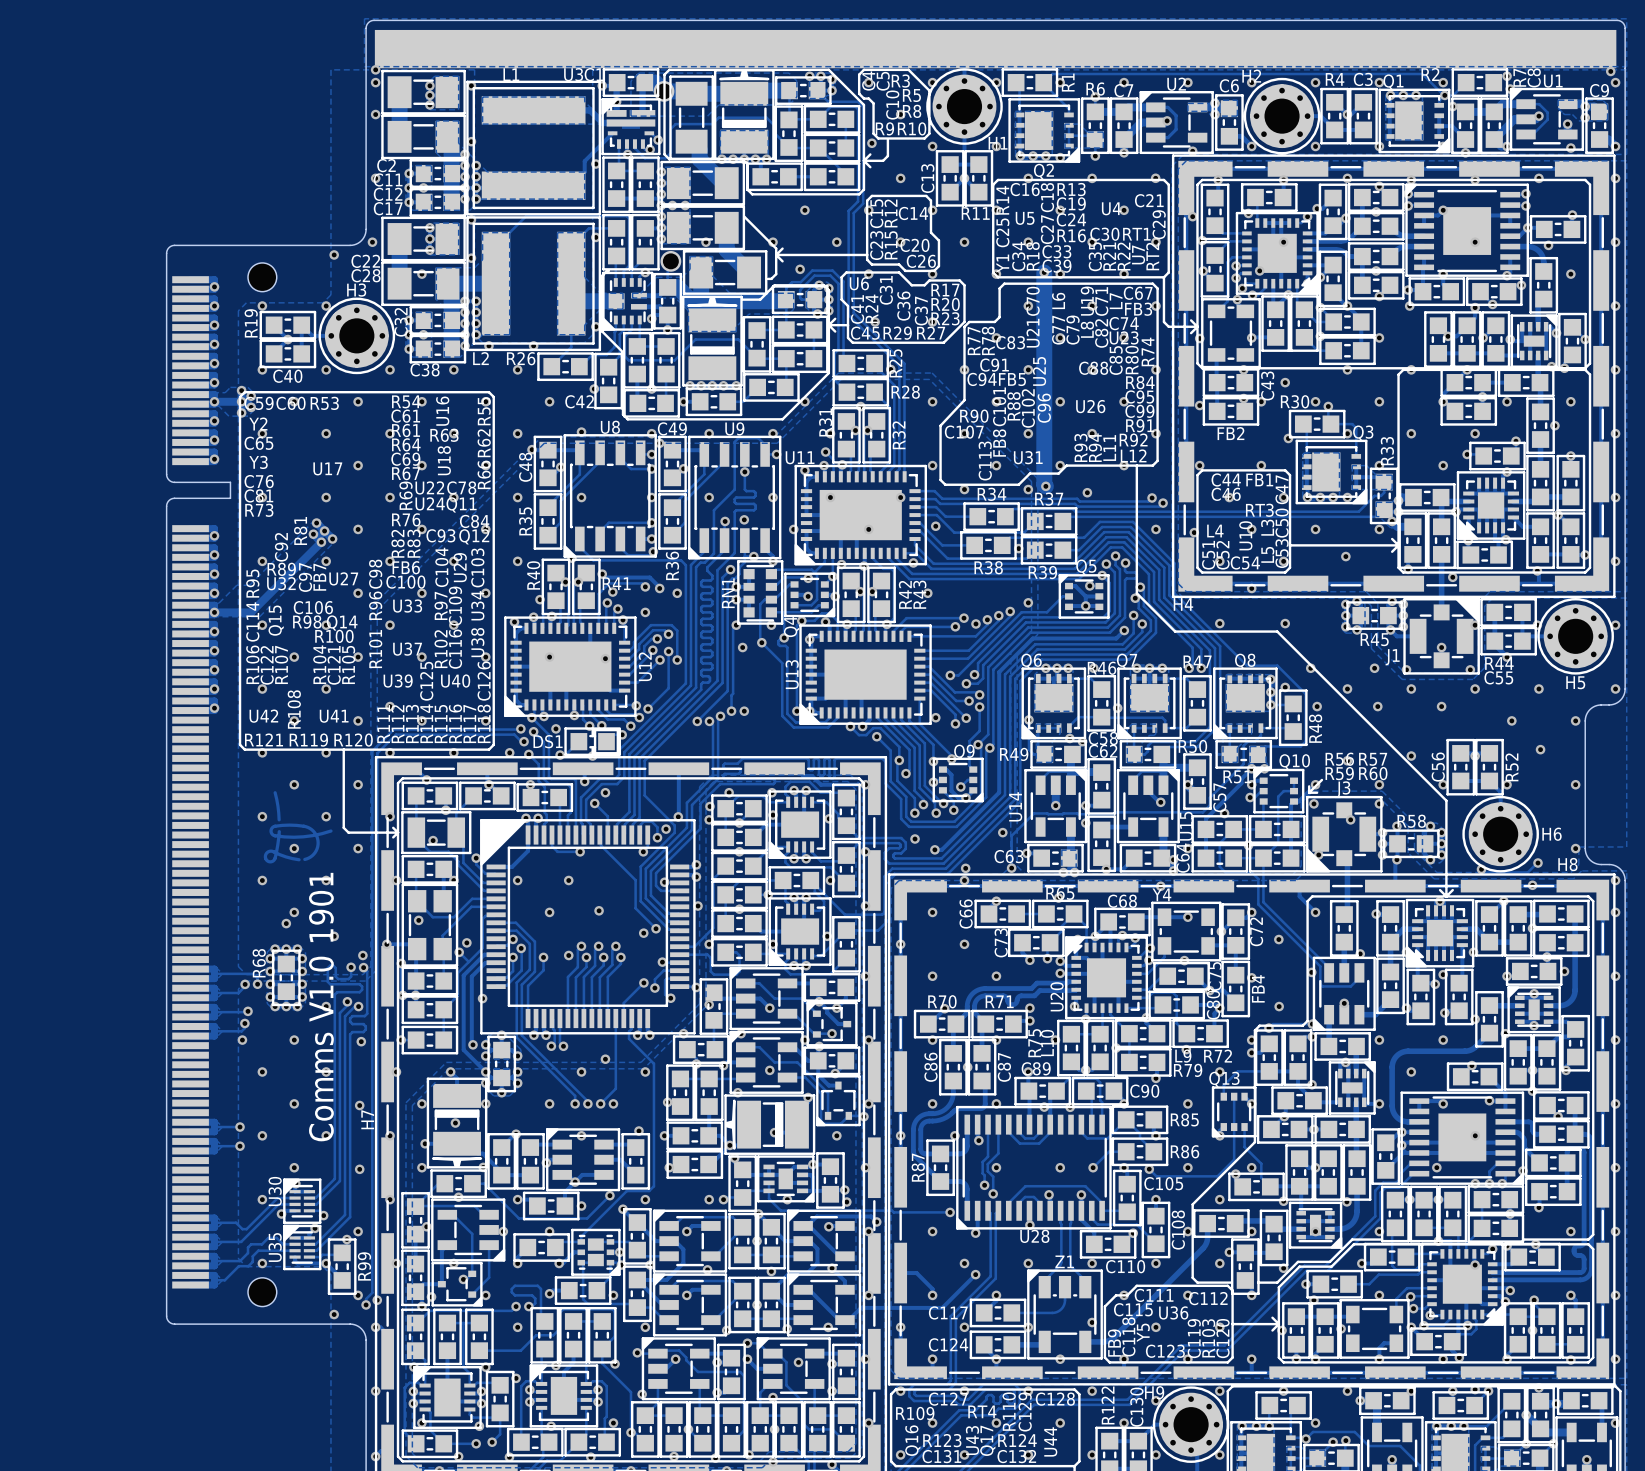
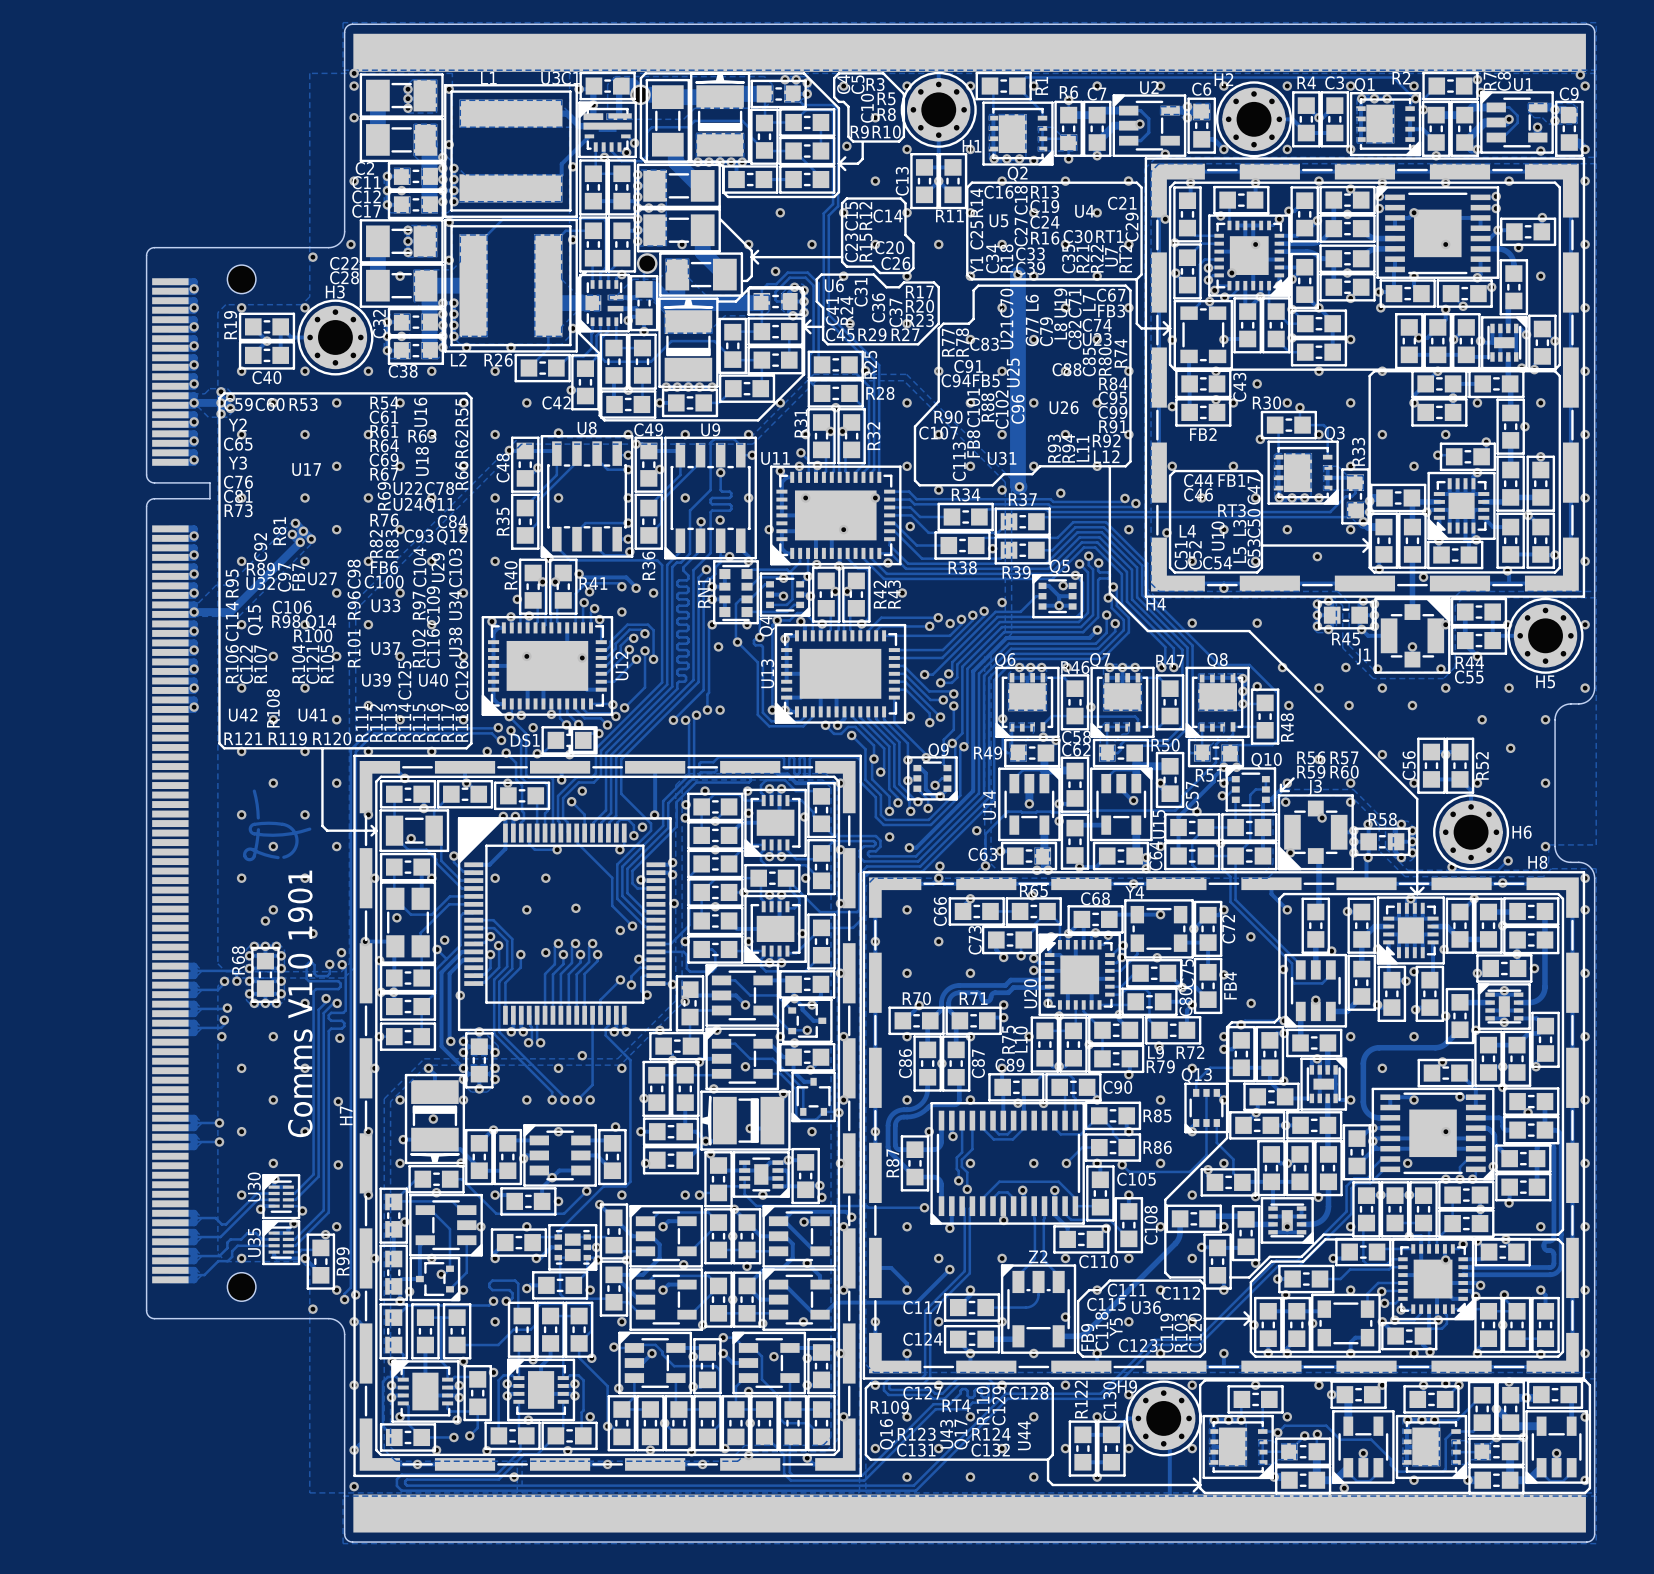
U28 name: U28 (1034, 1236) -> none
Z1 name: Z1 (1064, 1261) -> Z2 (1038, 1256)

